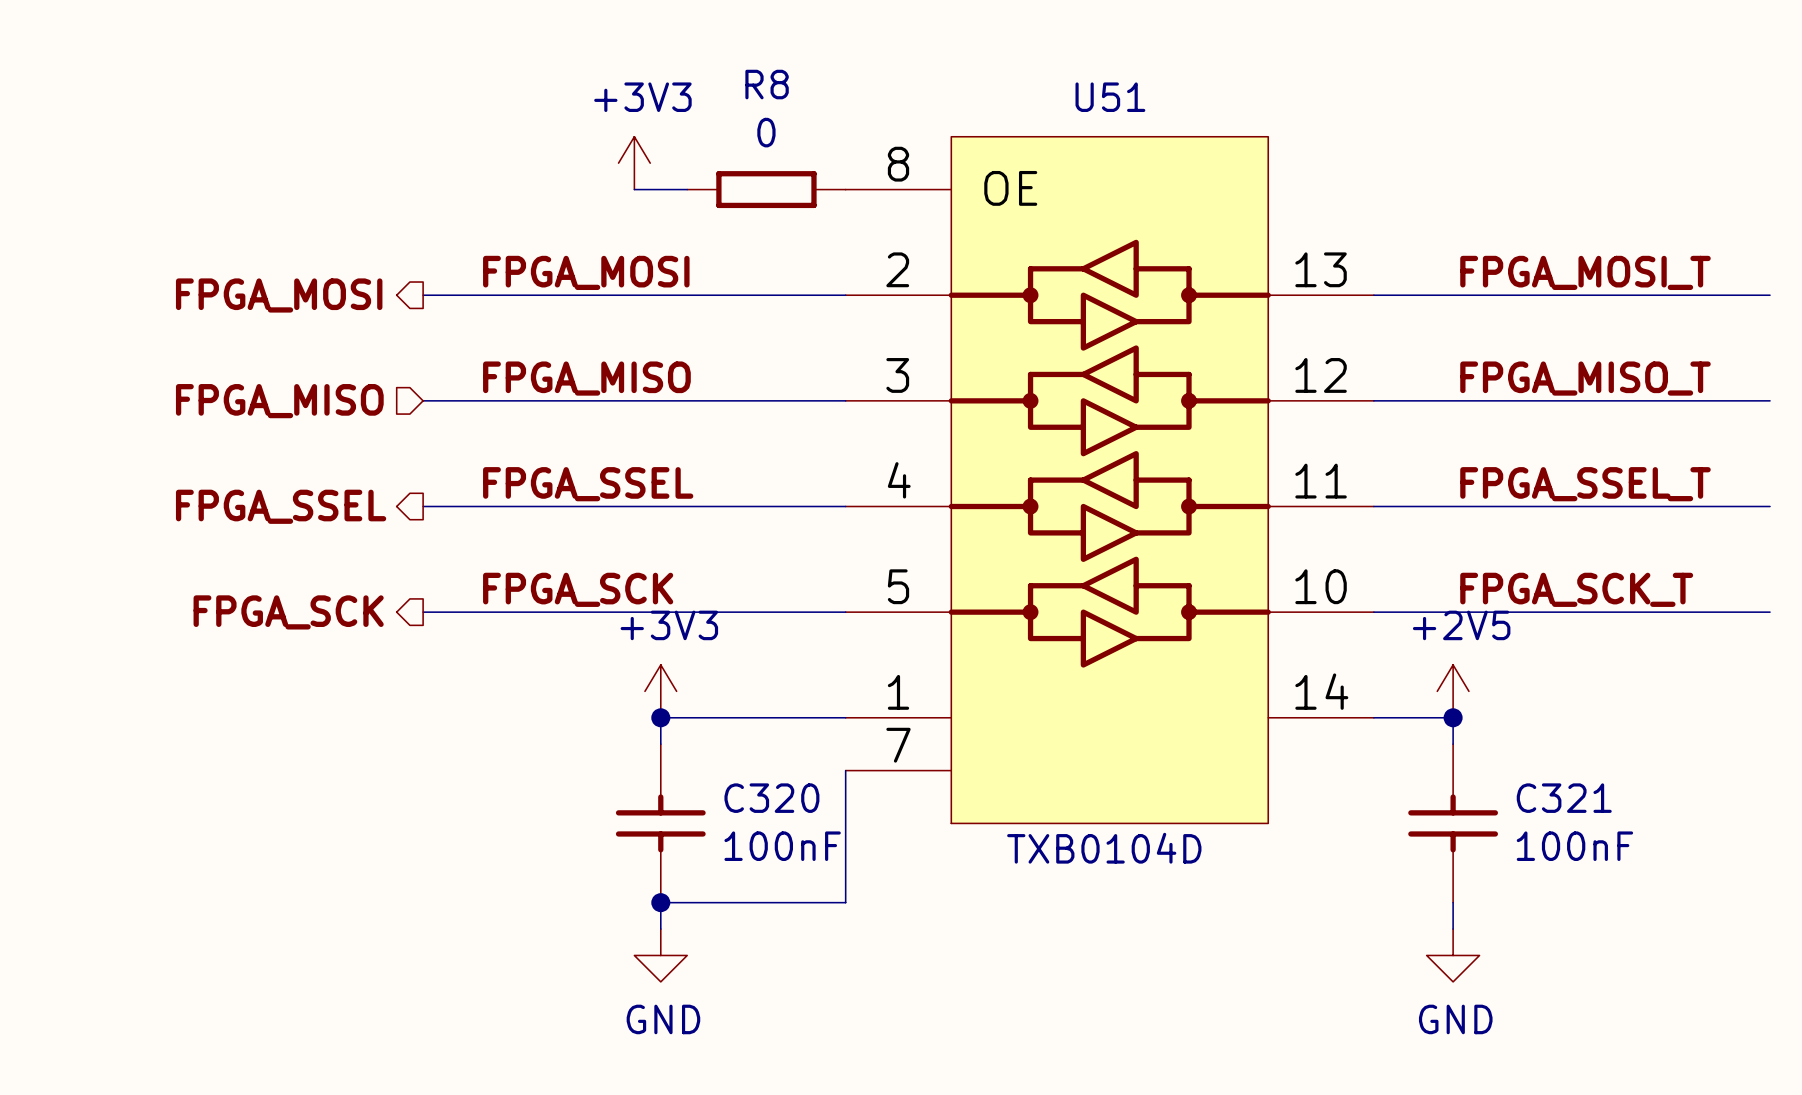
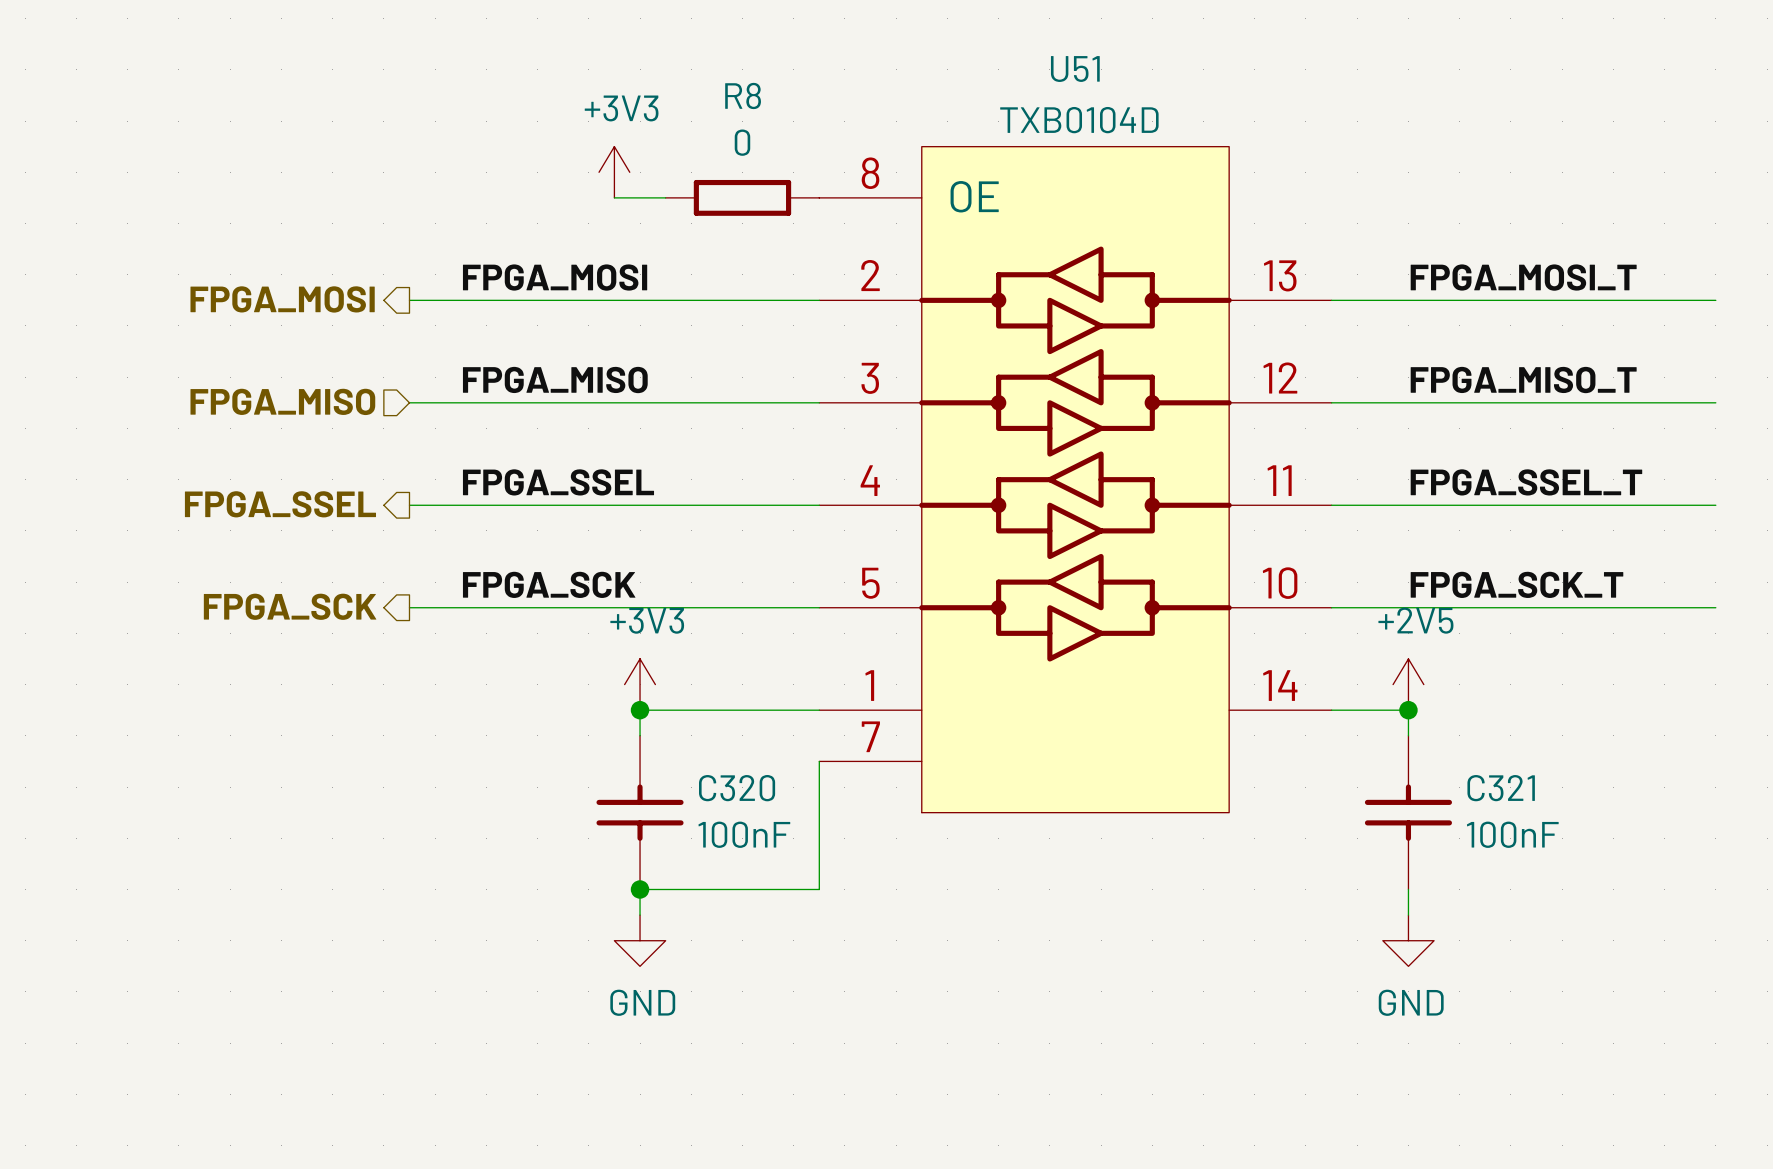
U51 name position: U51 (1110, 97) -> U51 (1075, 69)
U51 value position: TXB0104D (1104, 848) -> TXB0104D (1079, 120)

